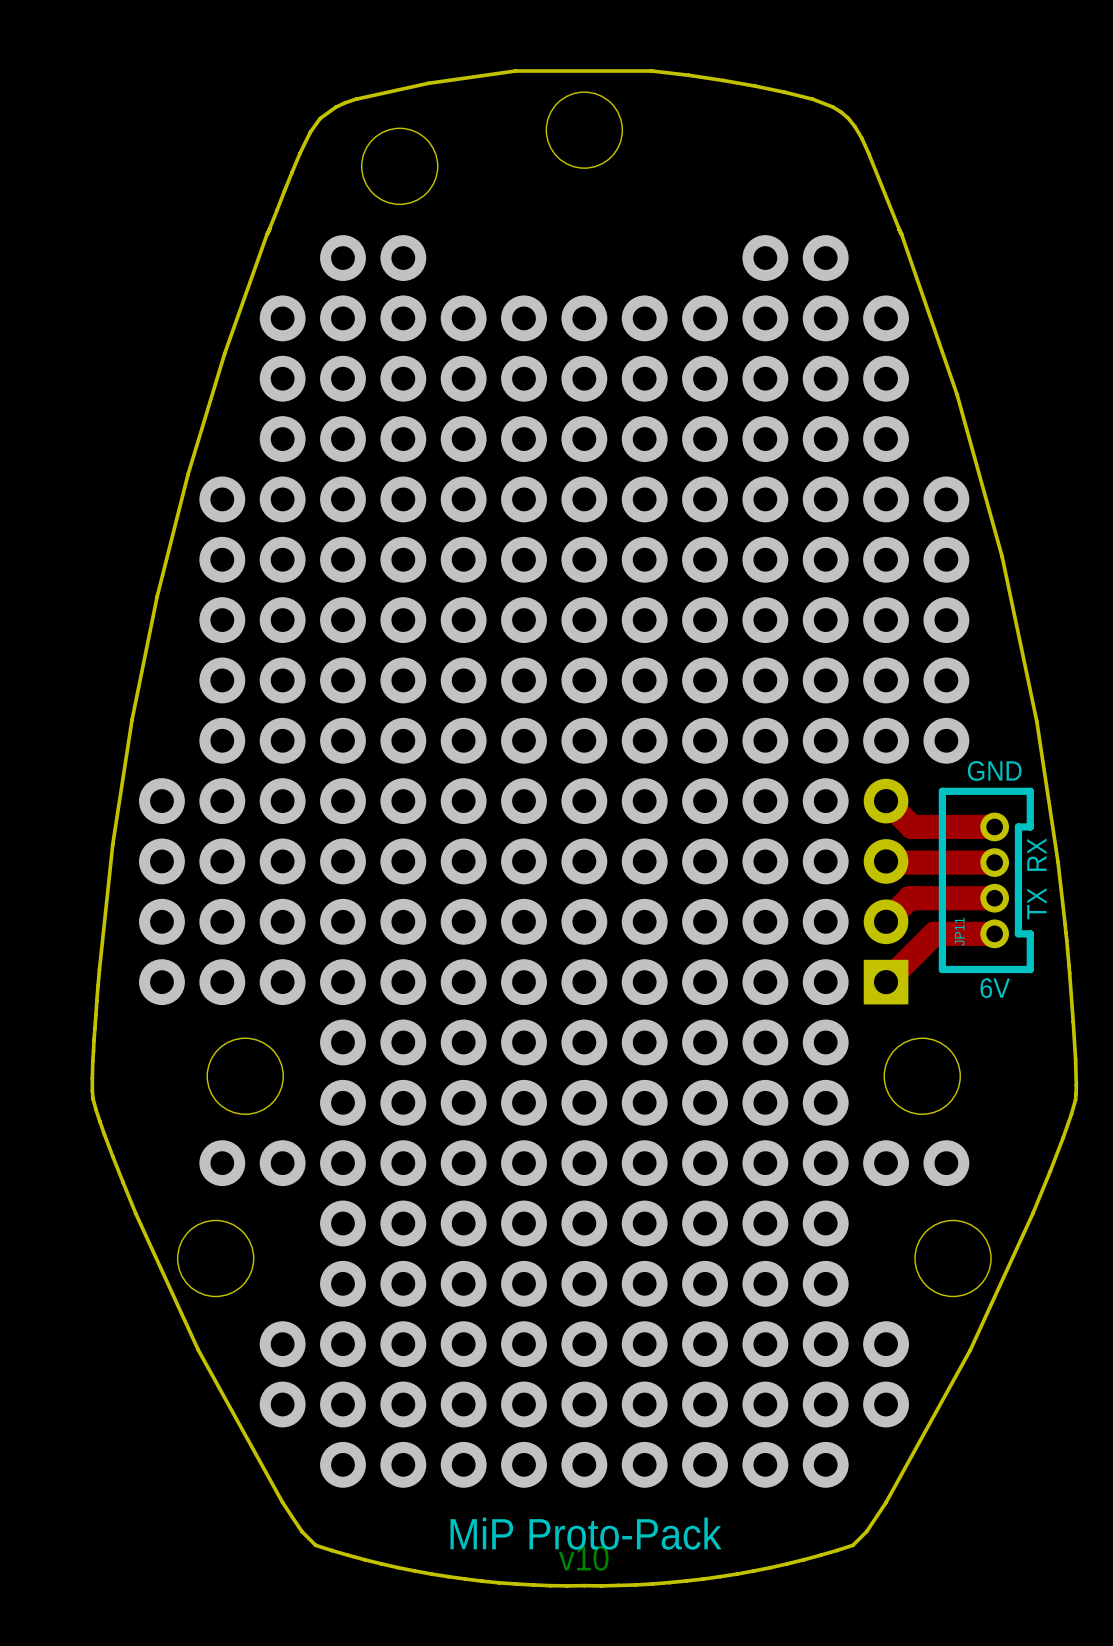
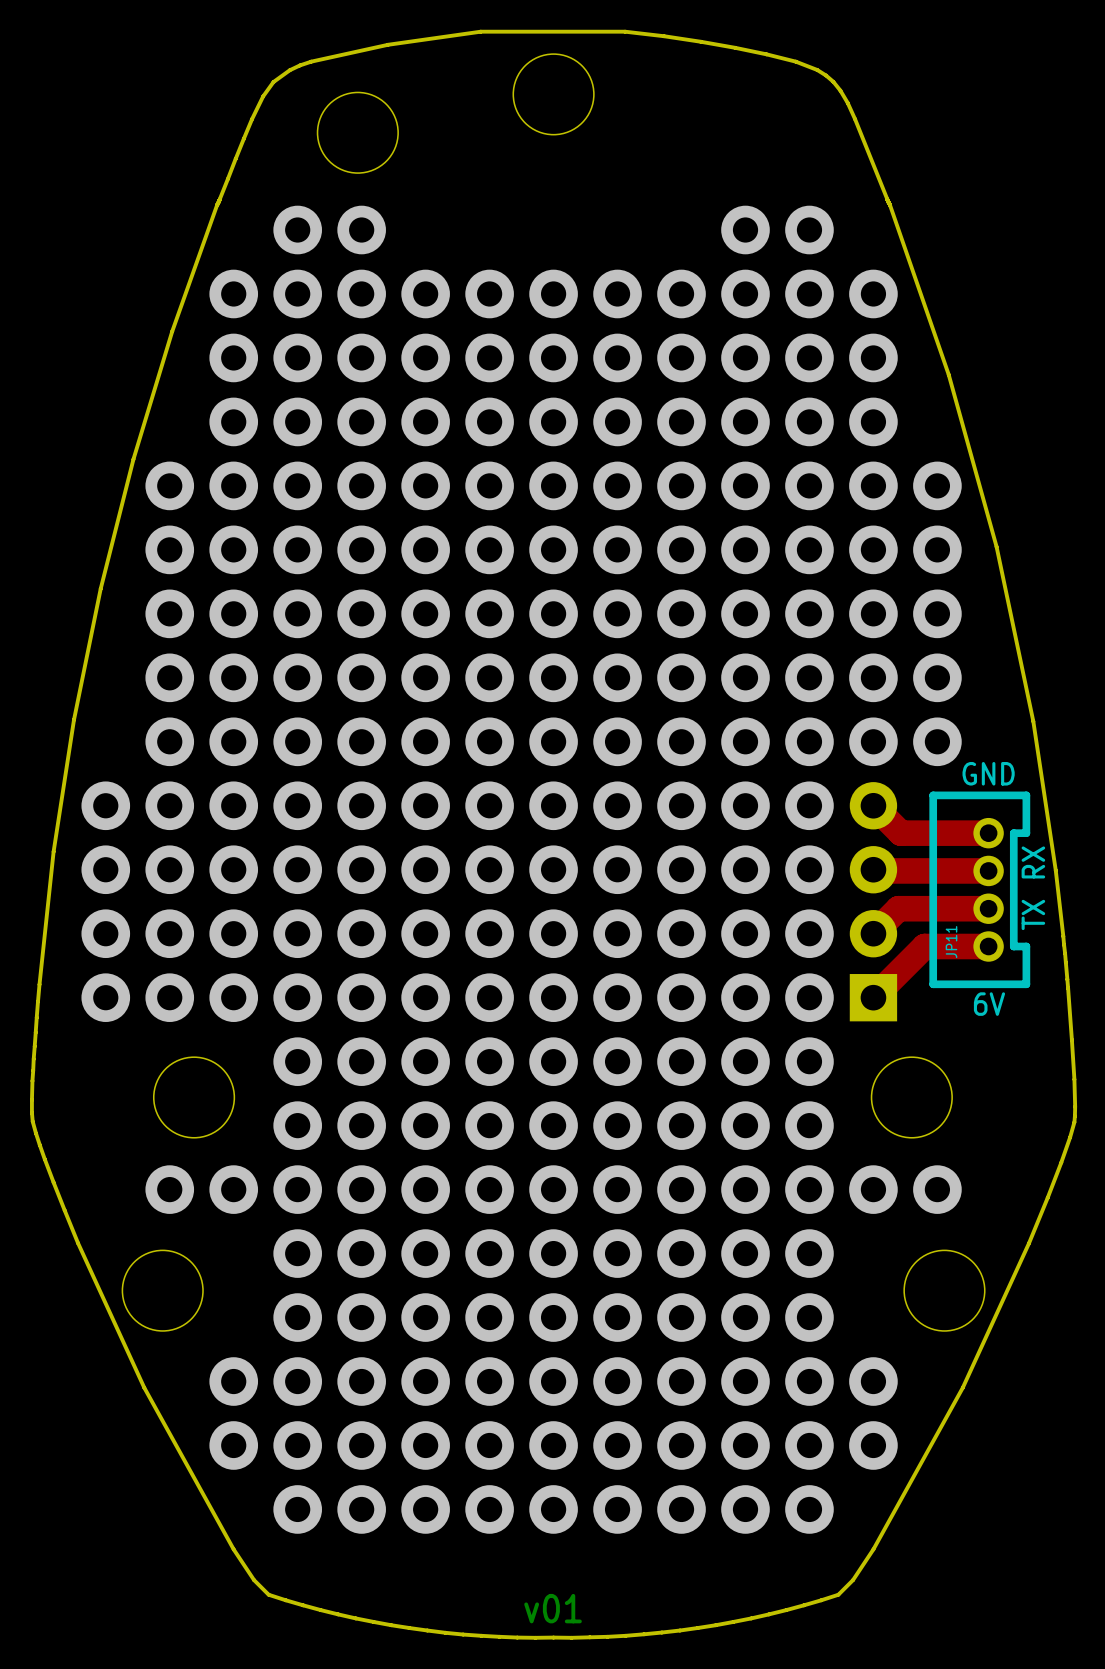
text: MiP Proto-Pack (585, 1533) -> none
text: v10 (583, 1558) -> v01 (553, 1608)

